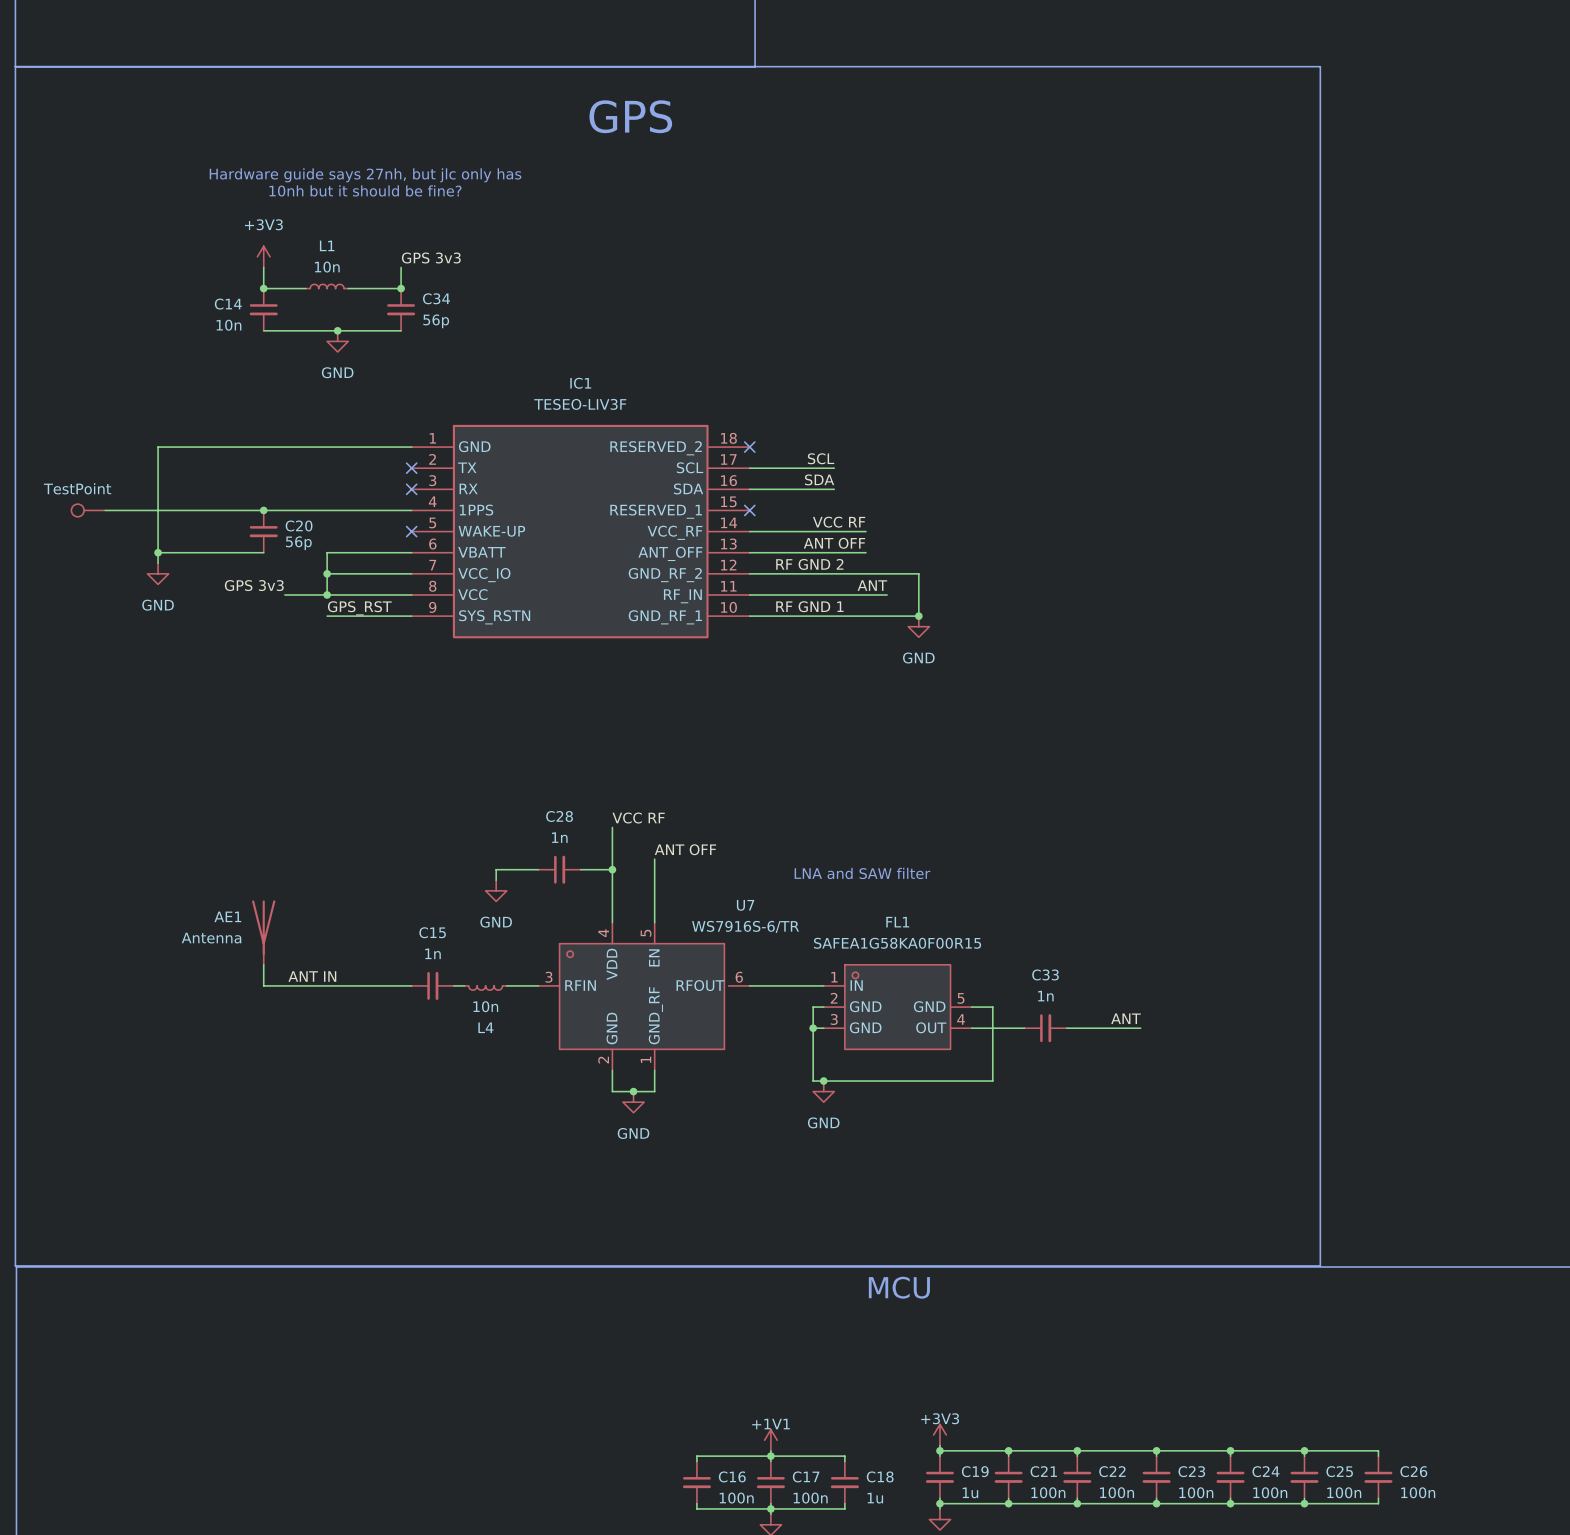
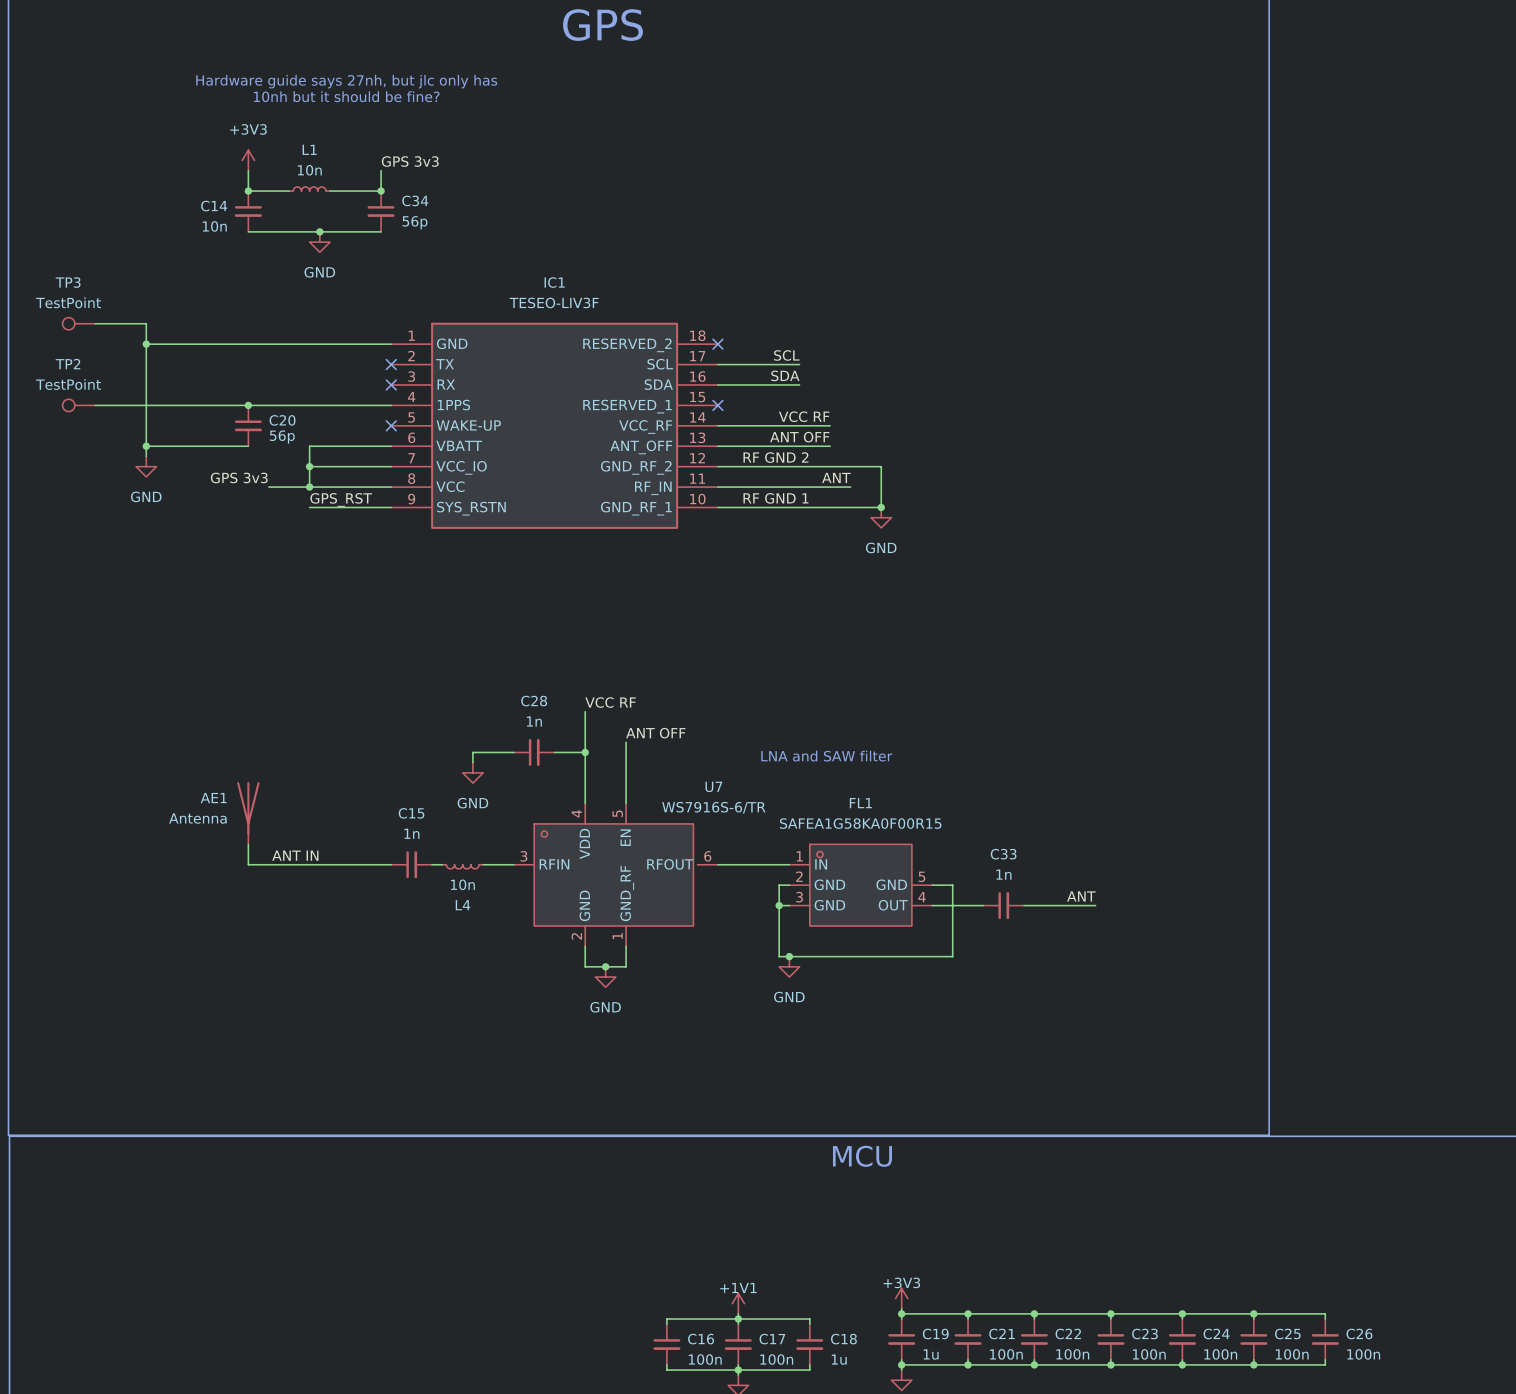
TP3: none -> TestPoint (78, 323)
wire: none -> (95, 323) (146, 323) (146, 344)
junction: none -> (146, 344)
TP2 name: none -> TP2 (67, 364)

